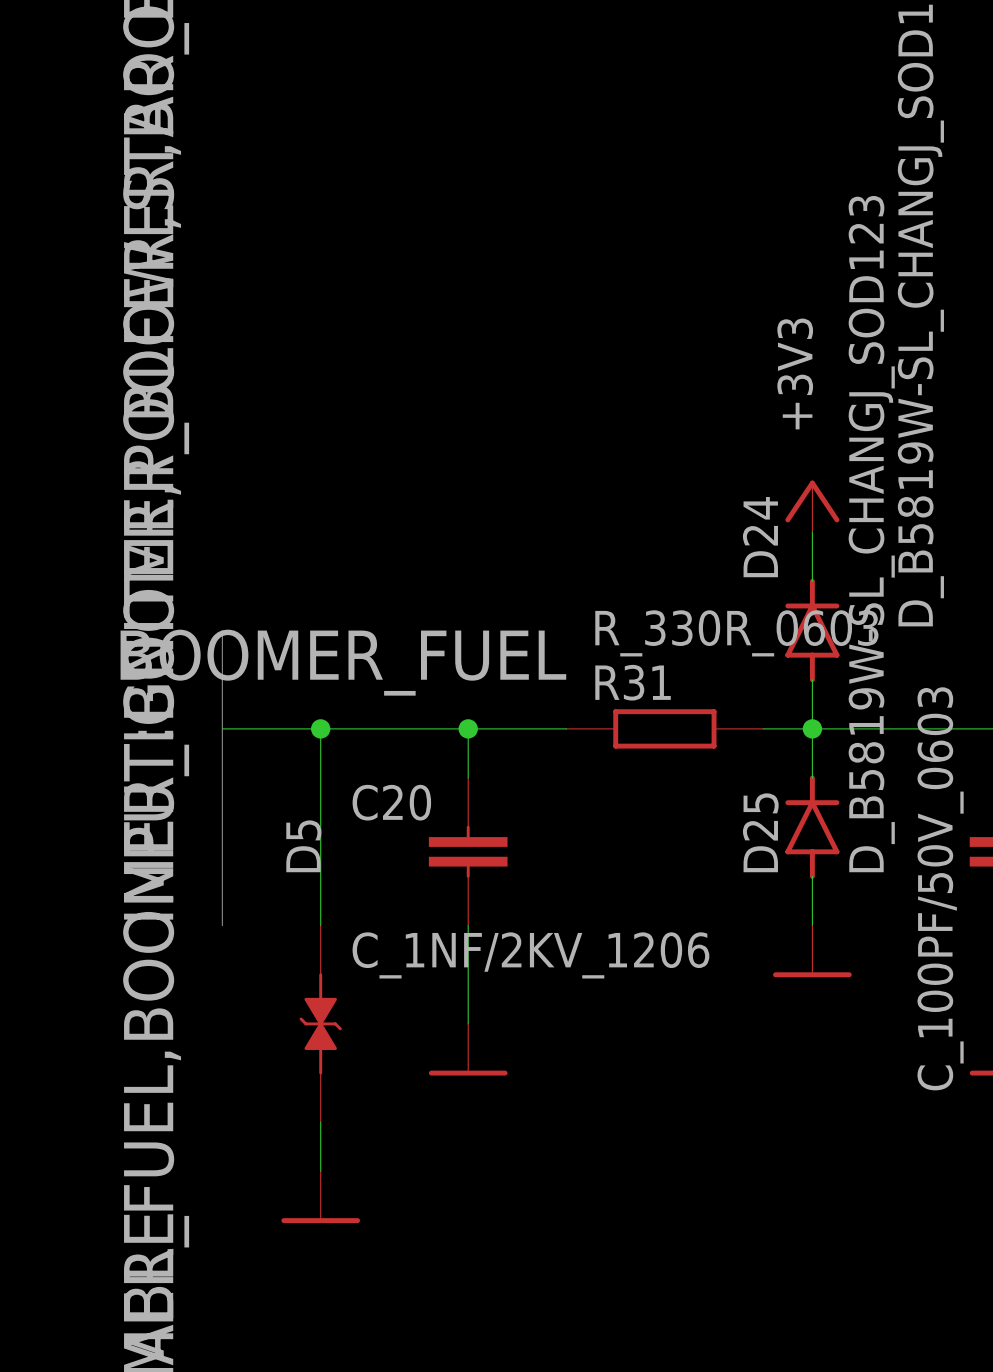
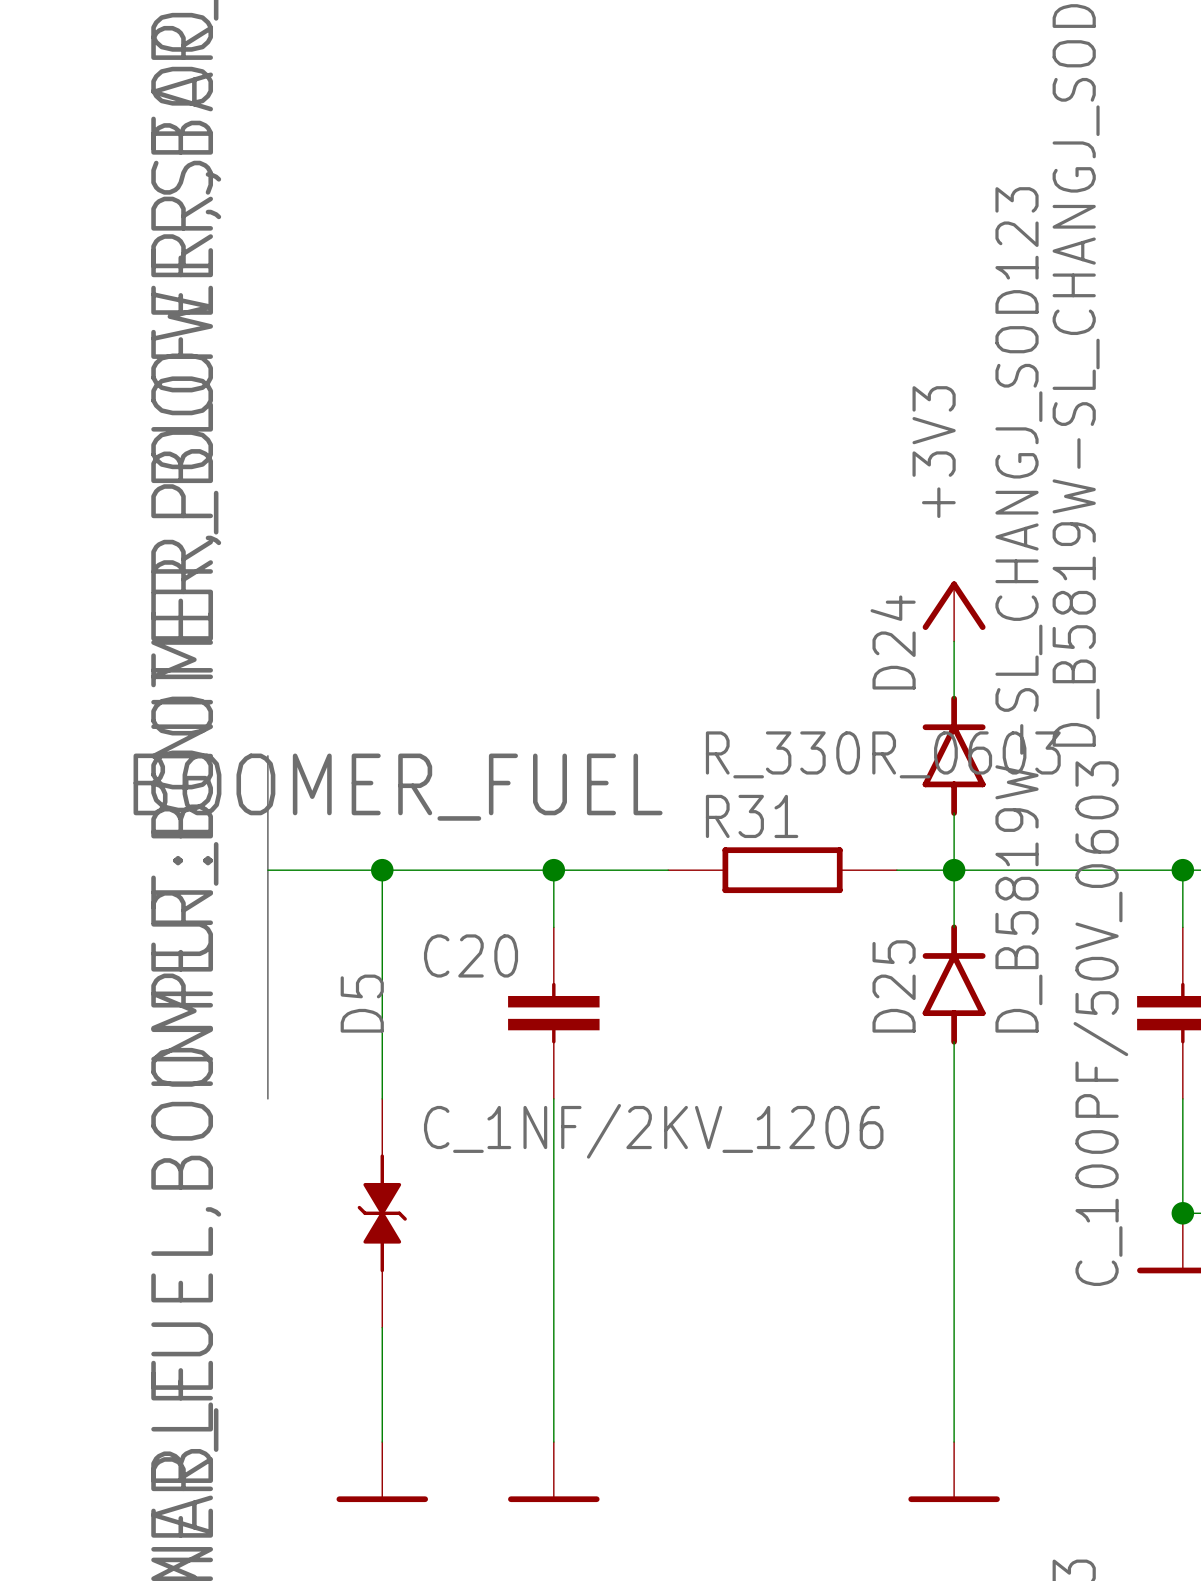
wire: none -> (954, 1098) (954, 1442)
power symbol: (812, 951) -> none
wire: none -> (553, 1213) (553, 1442)
power symbol: (468, 1049) -> none
power symbol position: (320, 1197) -> (382, 1472)
power symbol: none -> (553, 1472)
power symbol: none -> (954, 1472)

